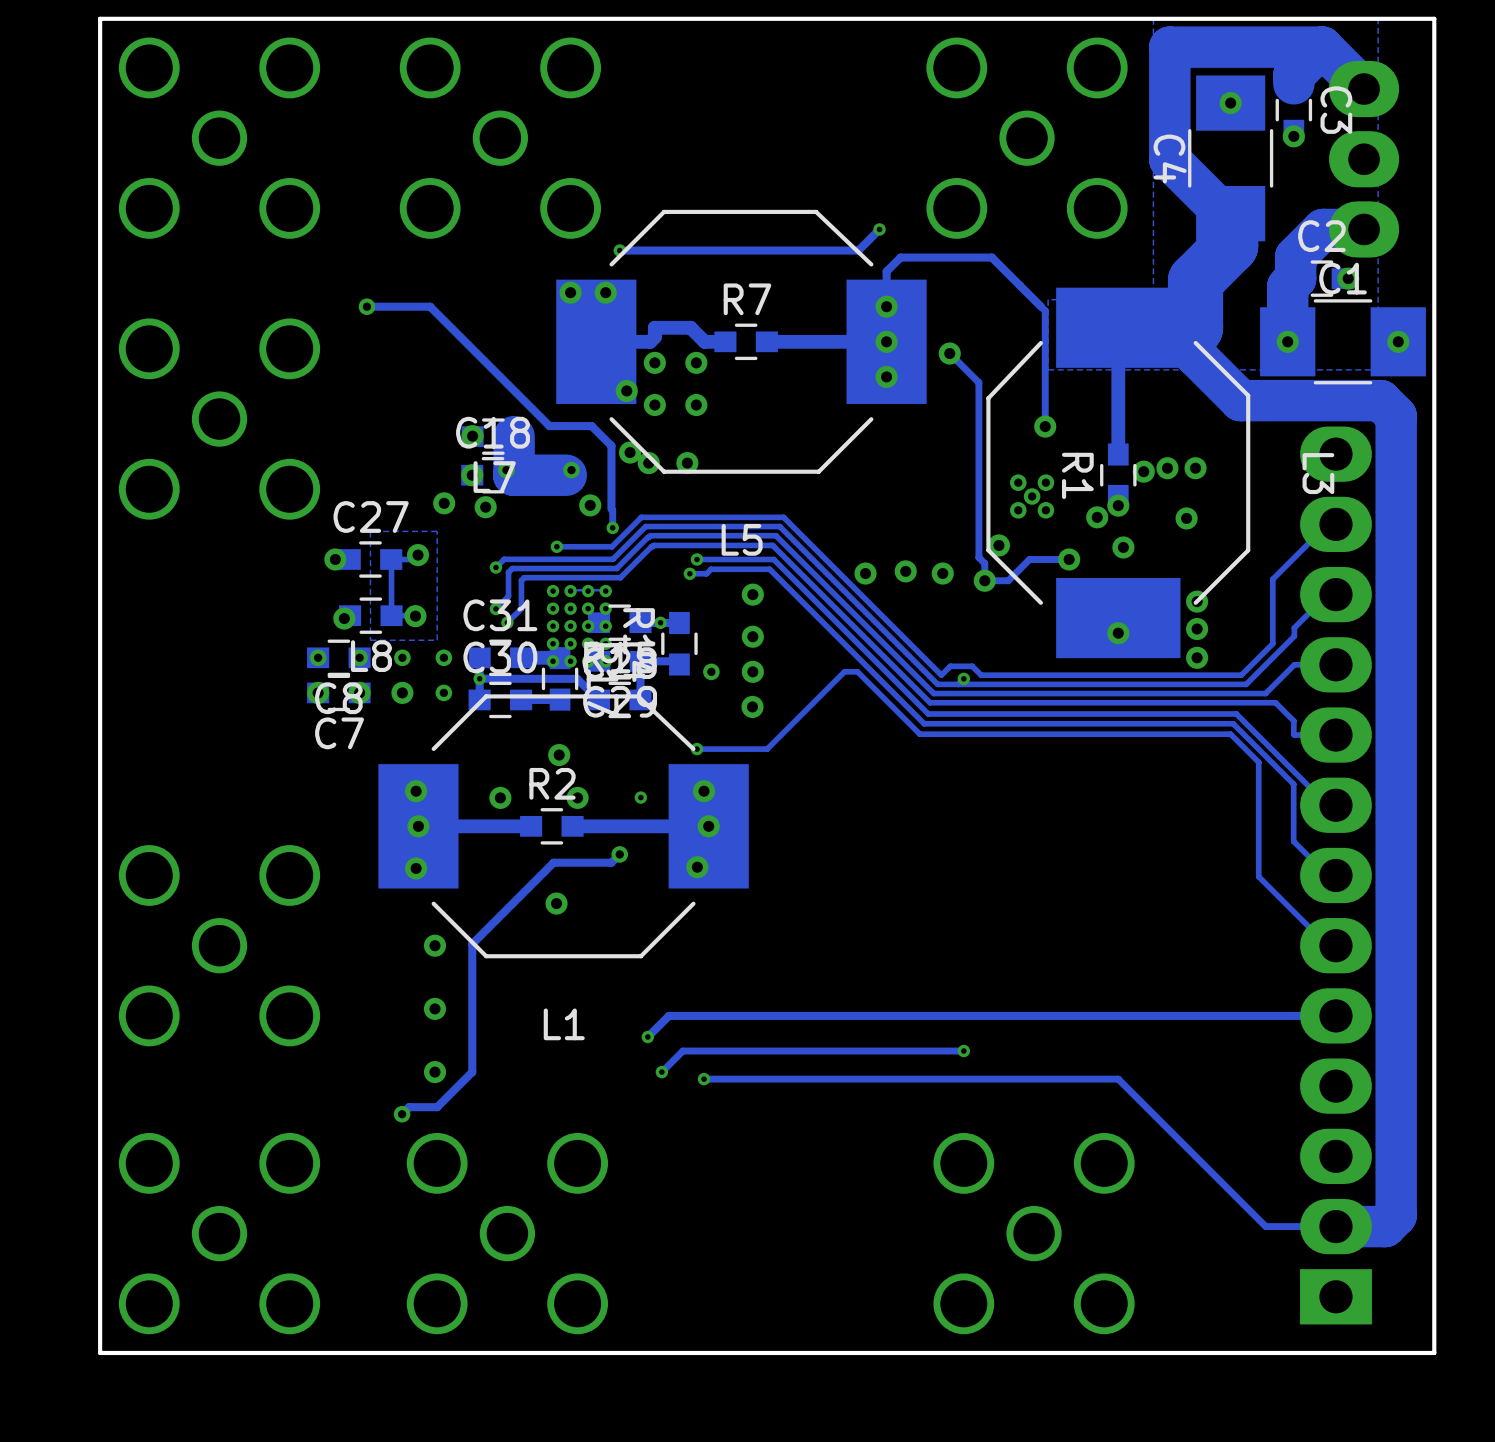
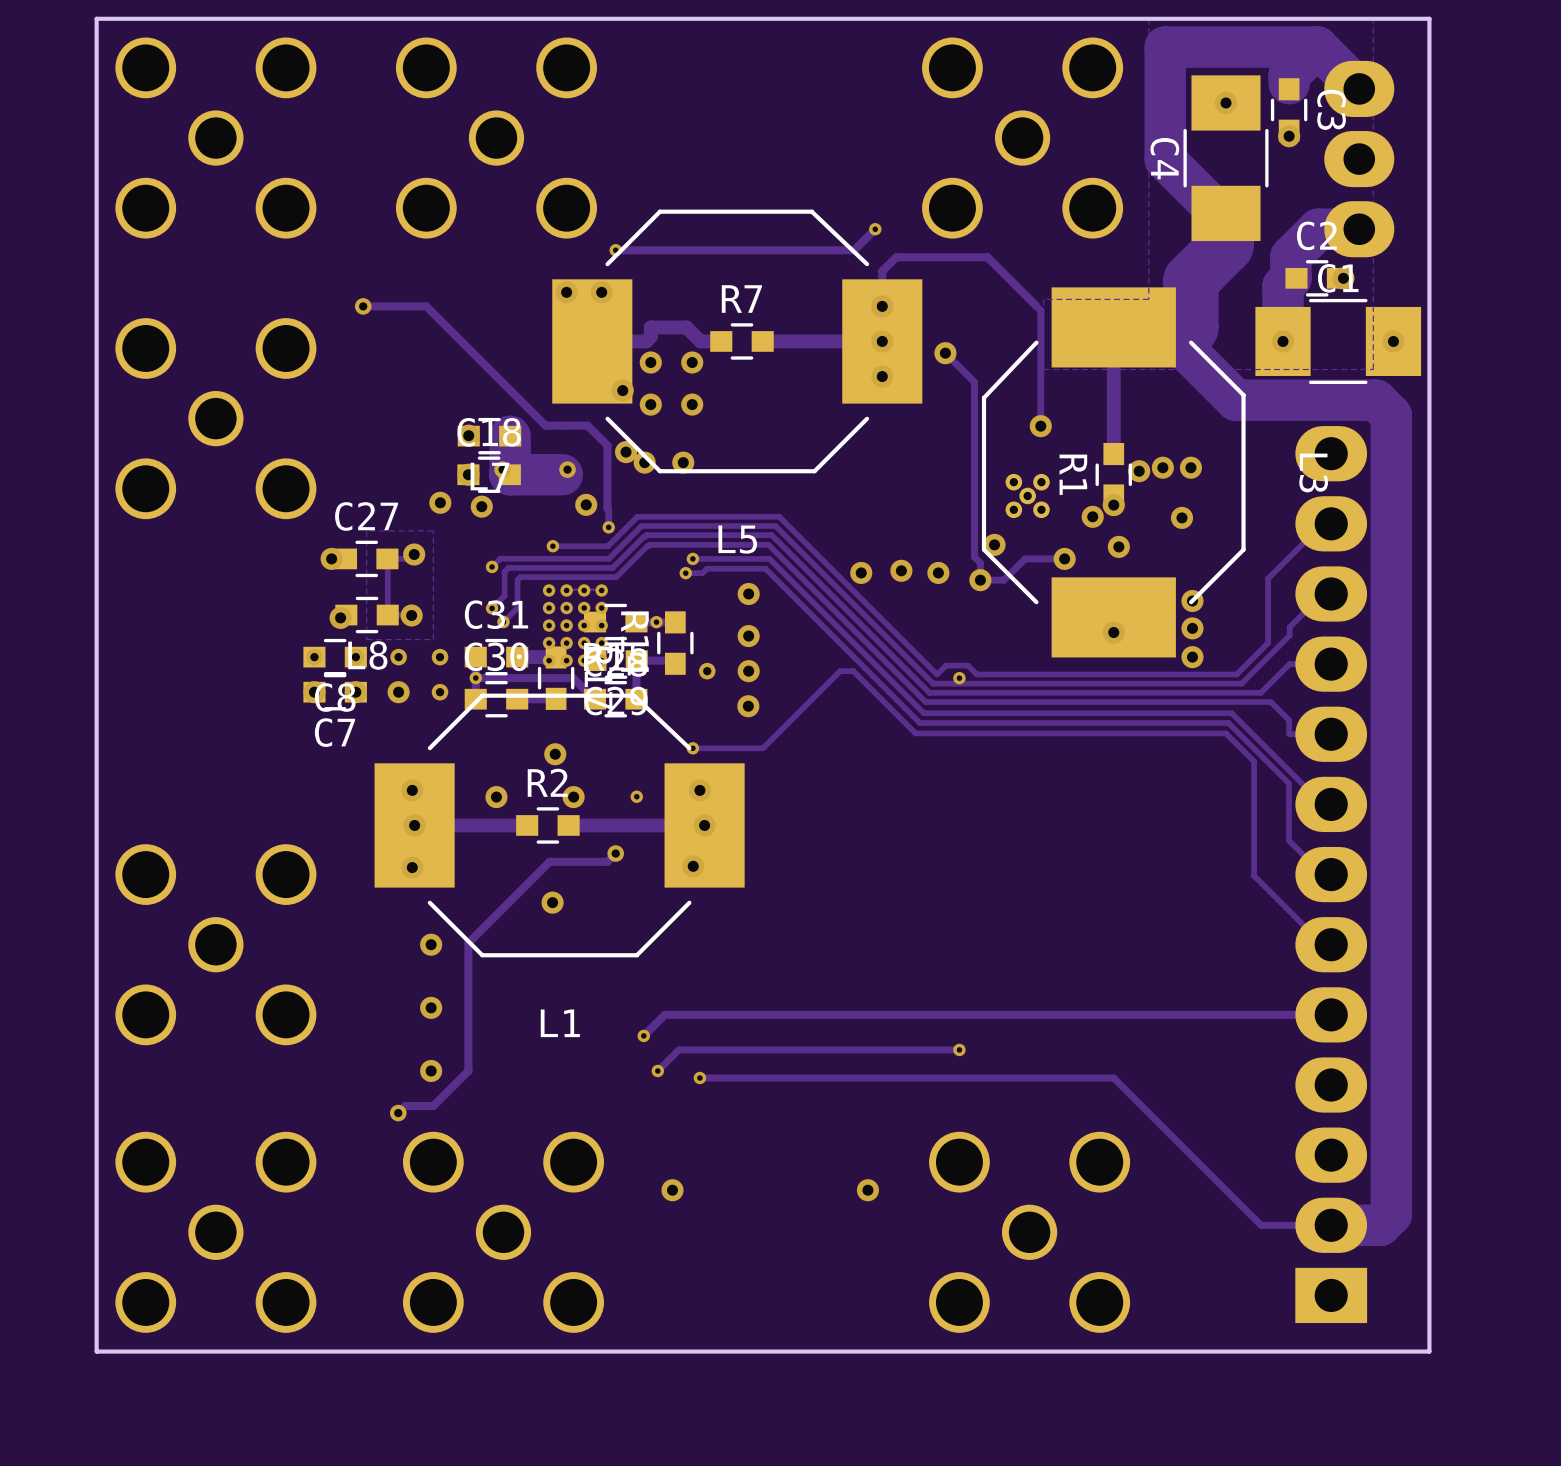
via: none -> (672, 1190)
via: none -> (867, 1190)

